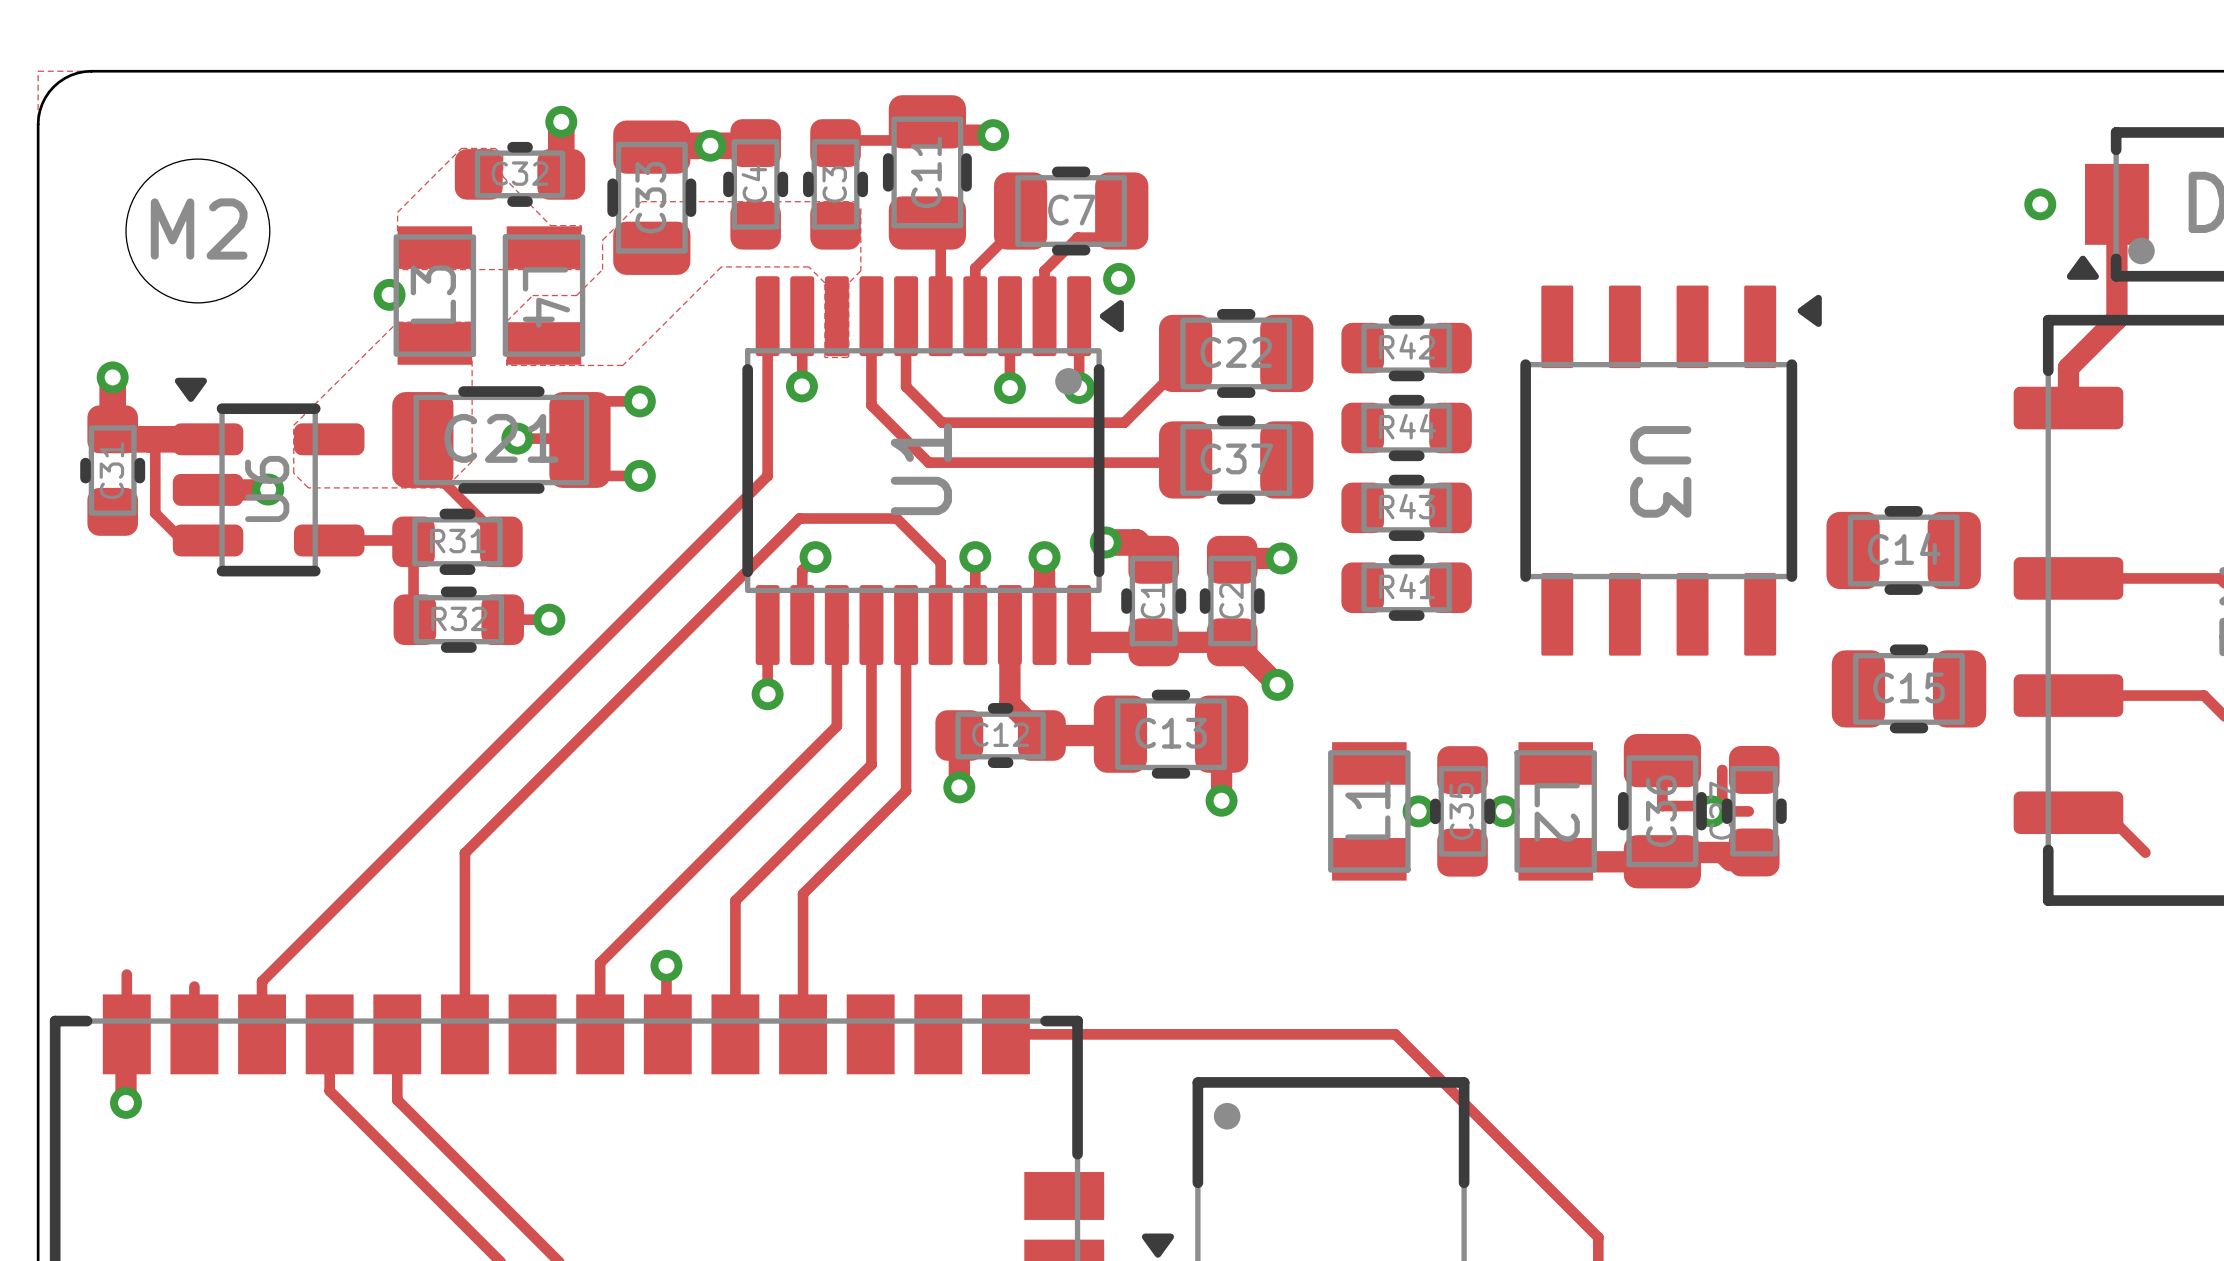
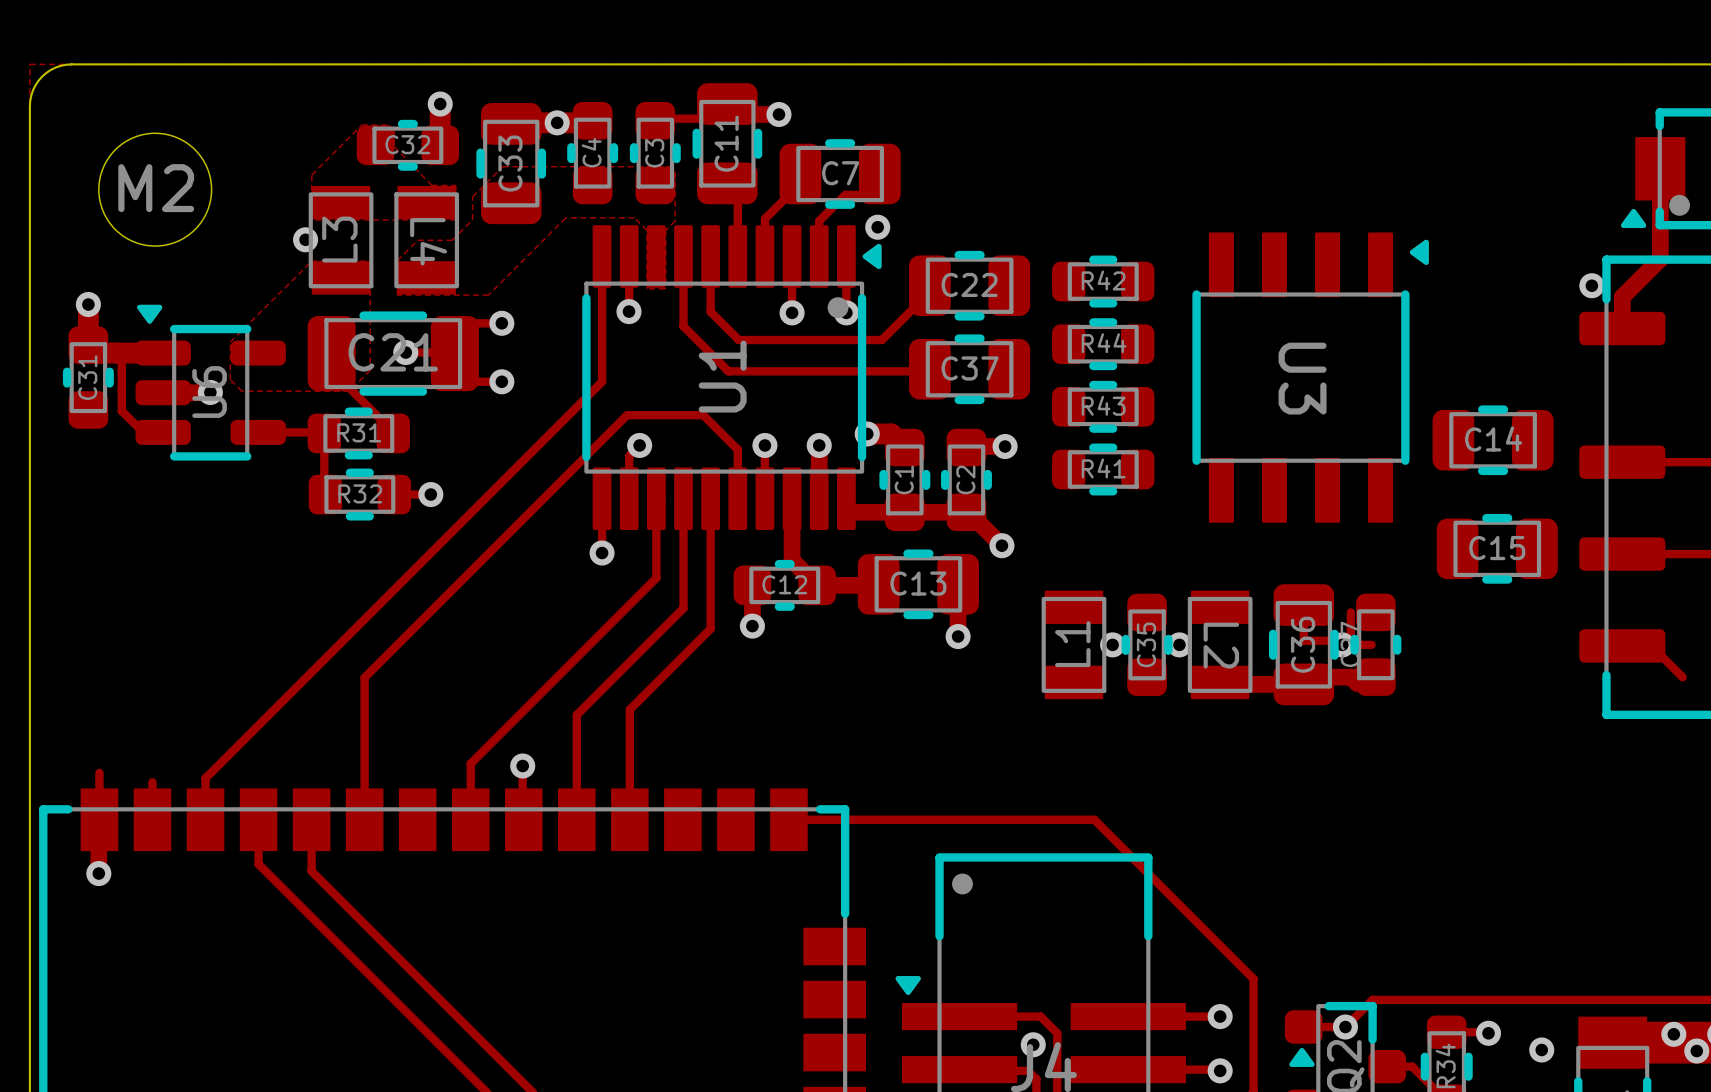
via position: (2040, 204) -> (1591, 285)

